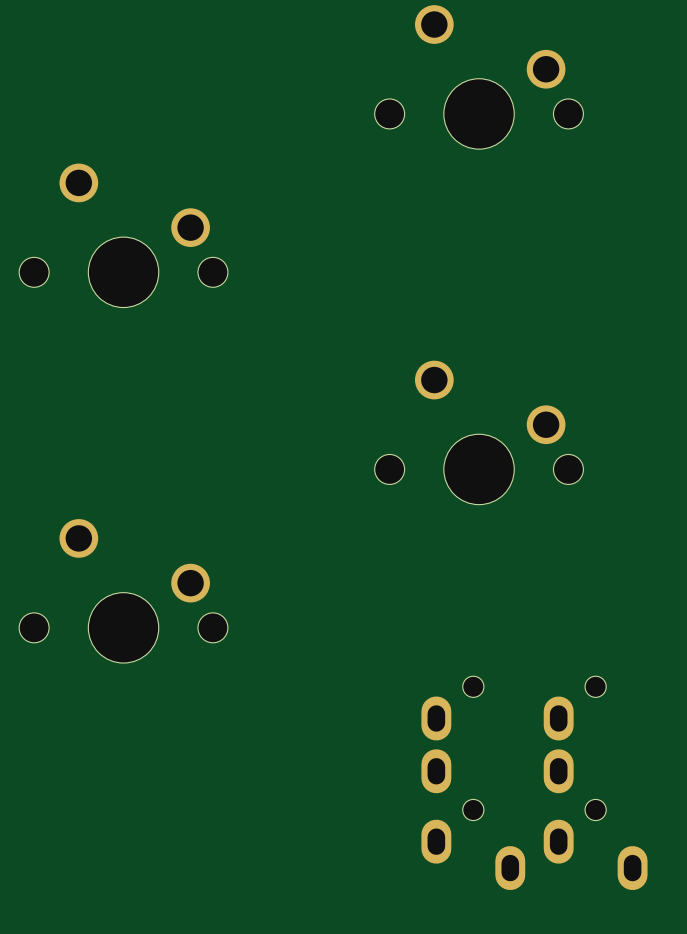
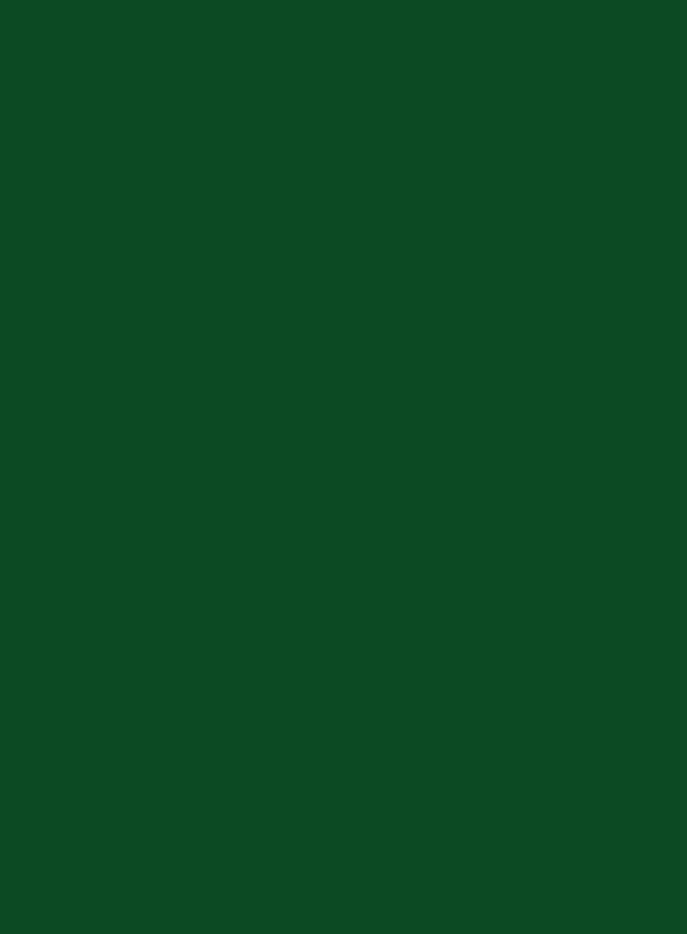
part: (479, 77) -> none
part: (123, 235) -> none
part: (479, 432) -> none
part: (123, 591) -> none
part: (473, 783) -> none
part: (595, 783) -> none

